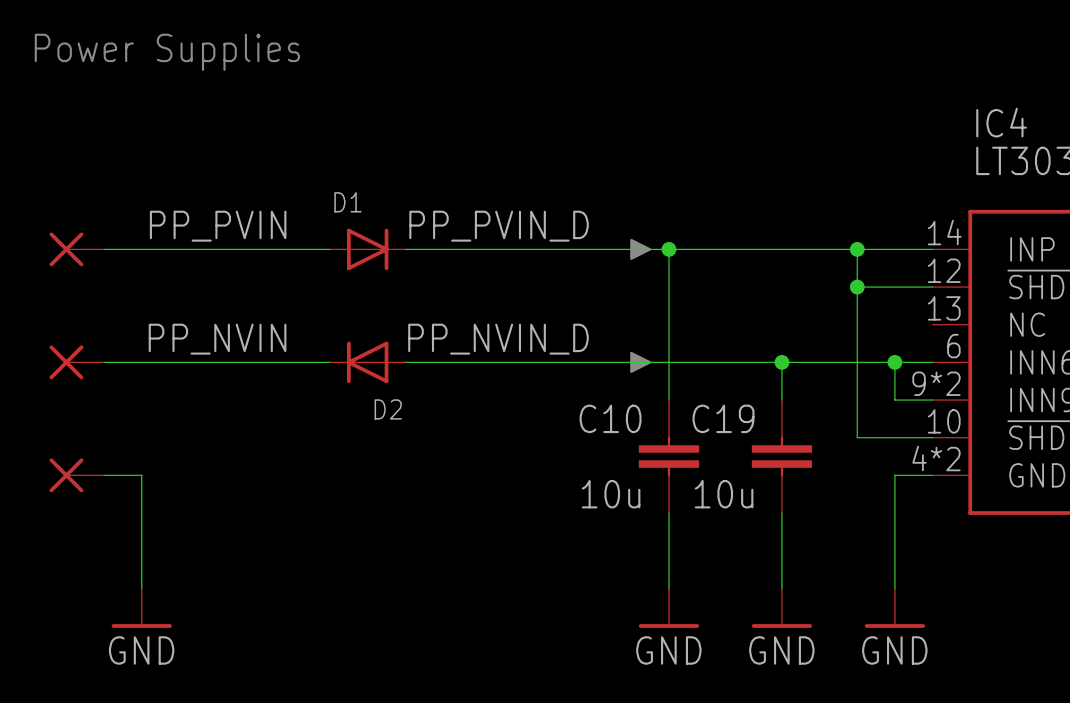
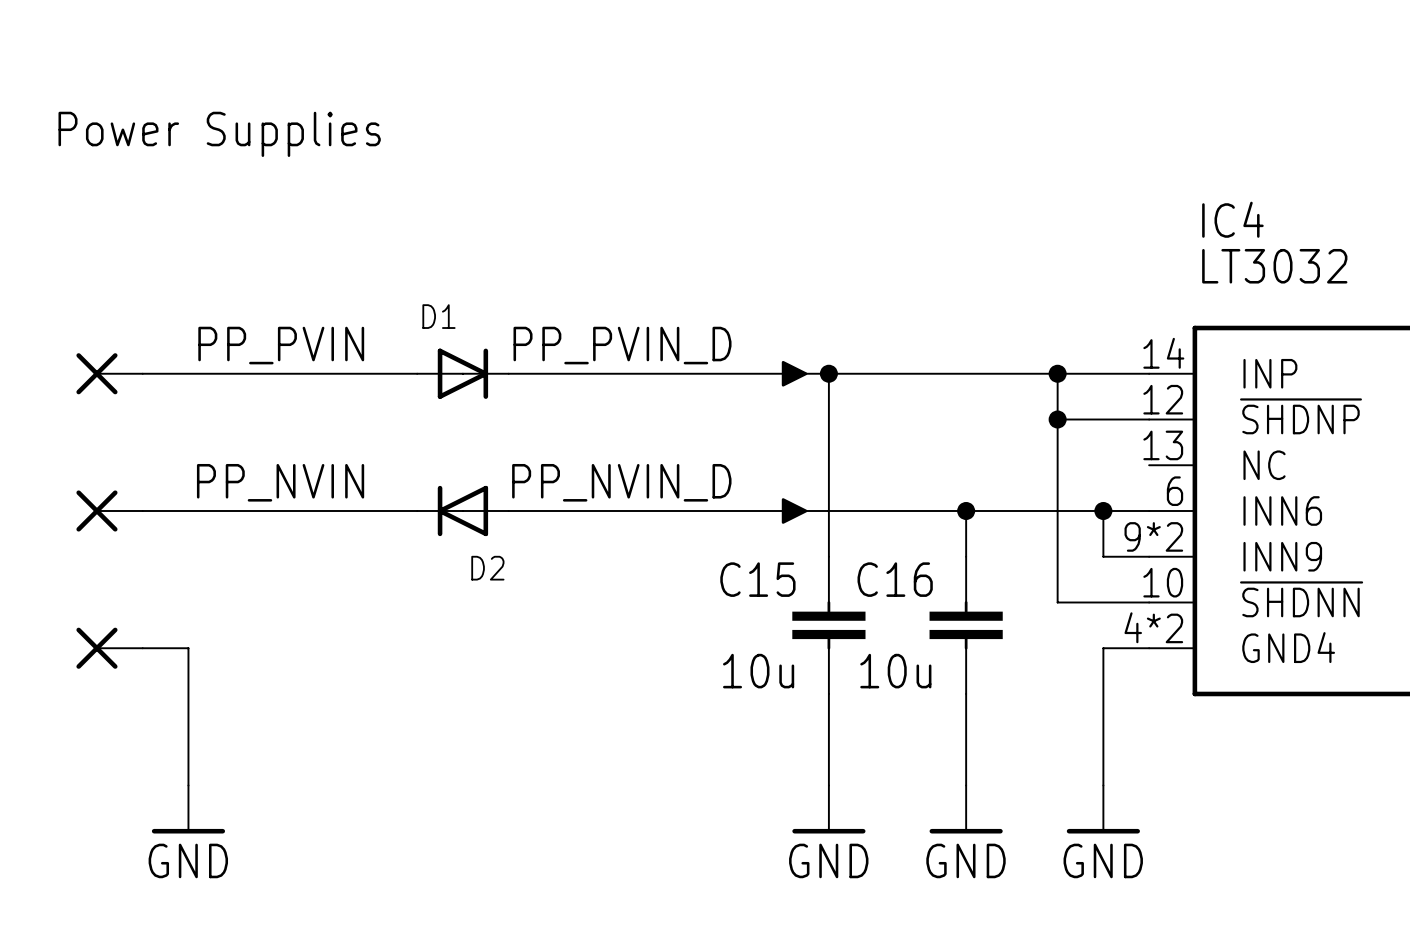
C10 name: C10 (610, 418) -> C15 (757, 579)
C19 name: C19 (723, 418) -> C16 (895, 579)

